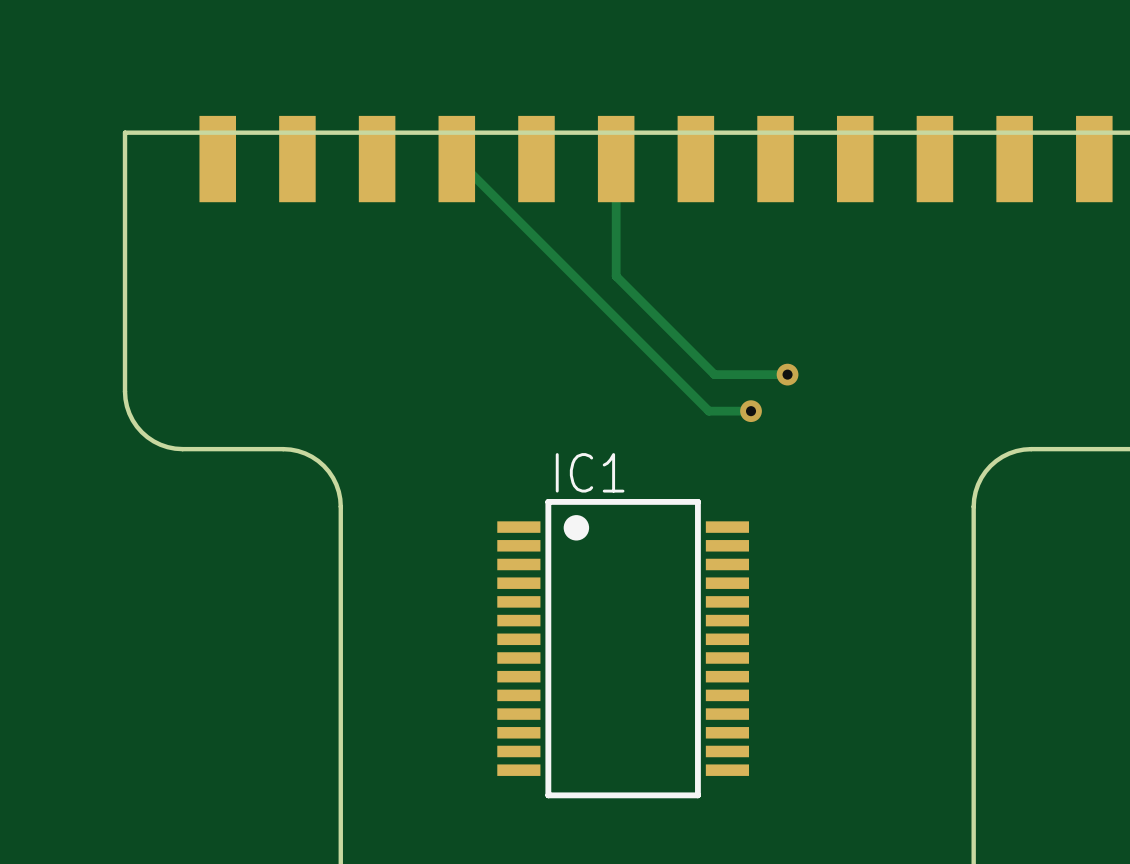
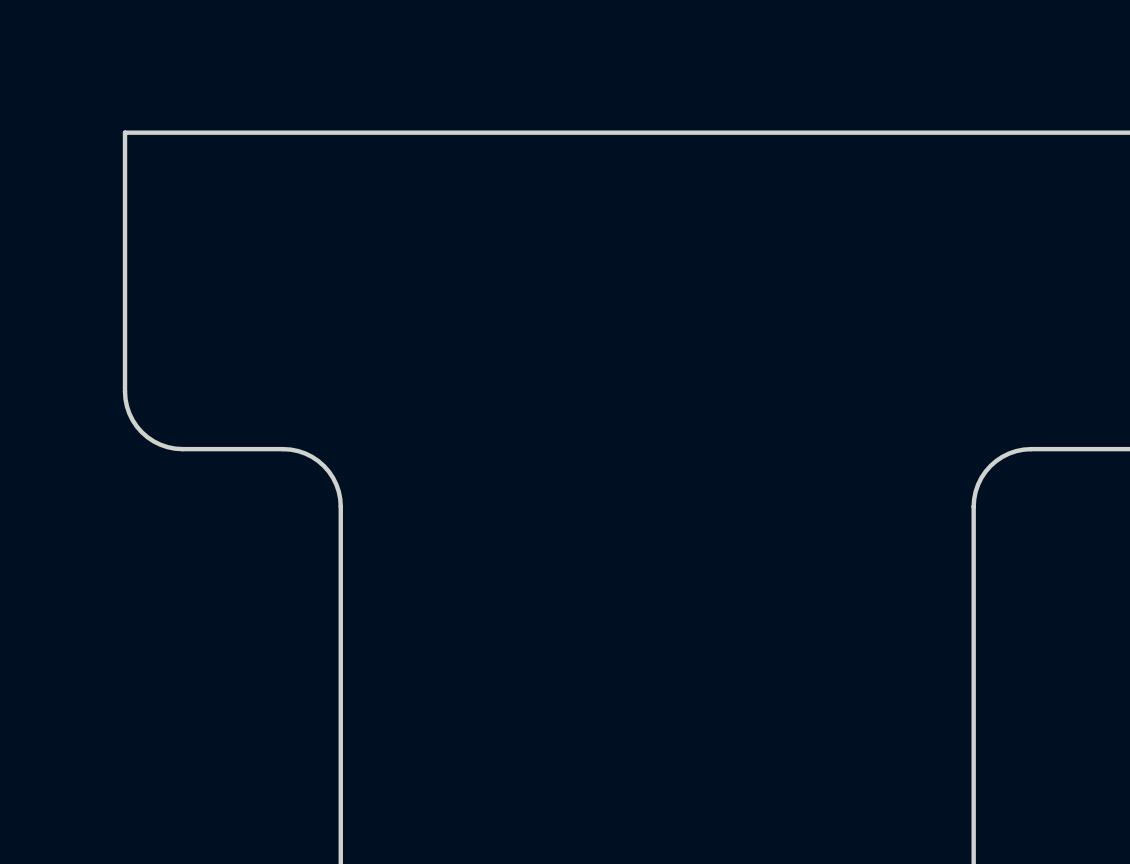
track: (456, 159) (708, 411) (751, 411) -> none
track: (616, 159) (616, 276) (714, 374) (787, 374) -> none
part: (656, 159) -> none
via: (787, 374) -> none
via: (751, 411) -> none
IC1: (623, 648) -> none

